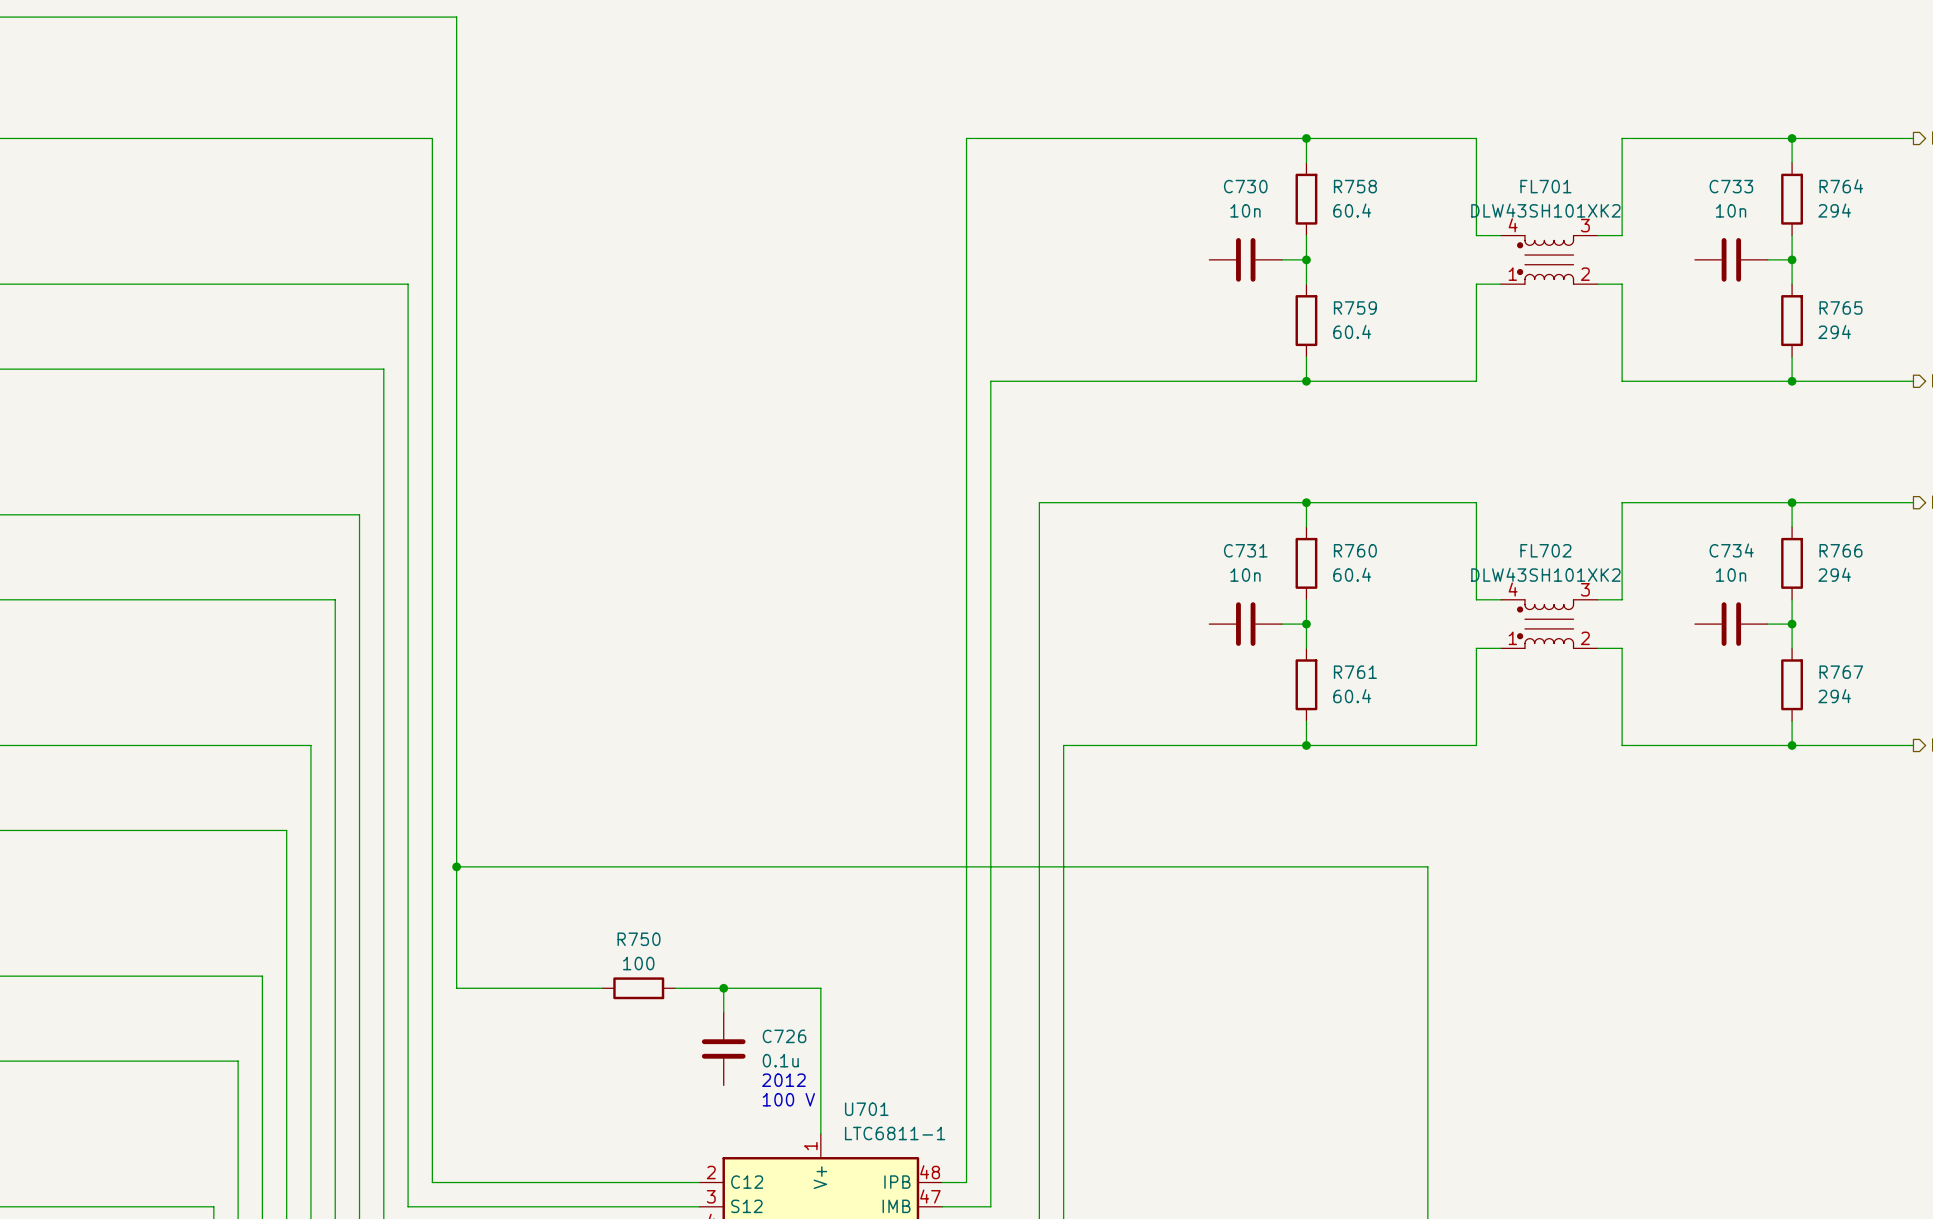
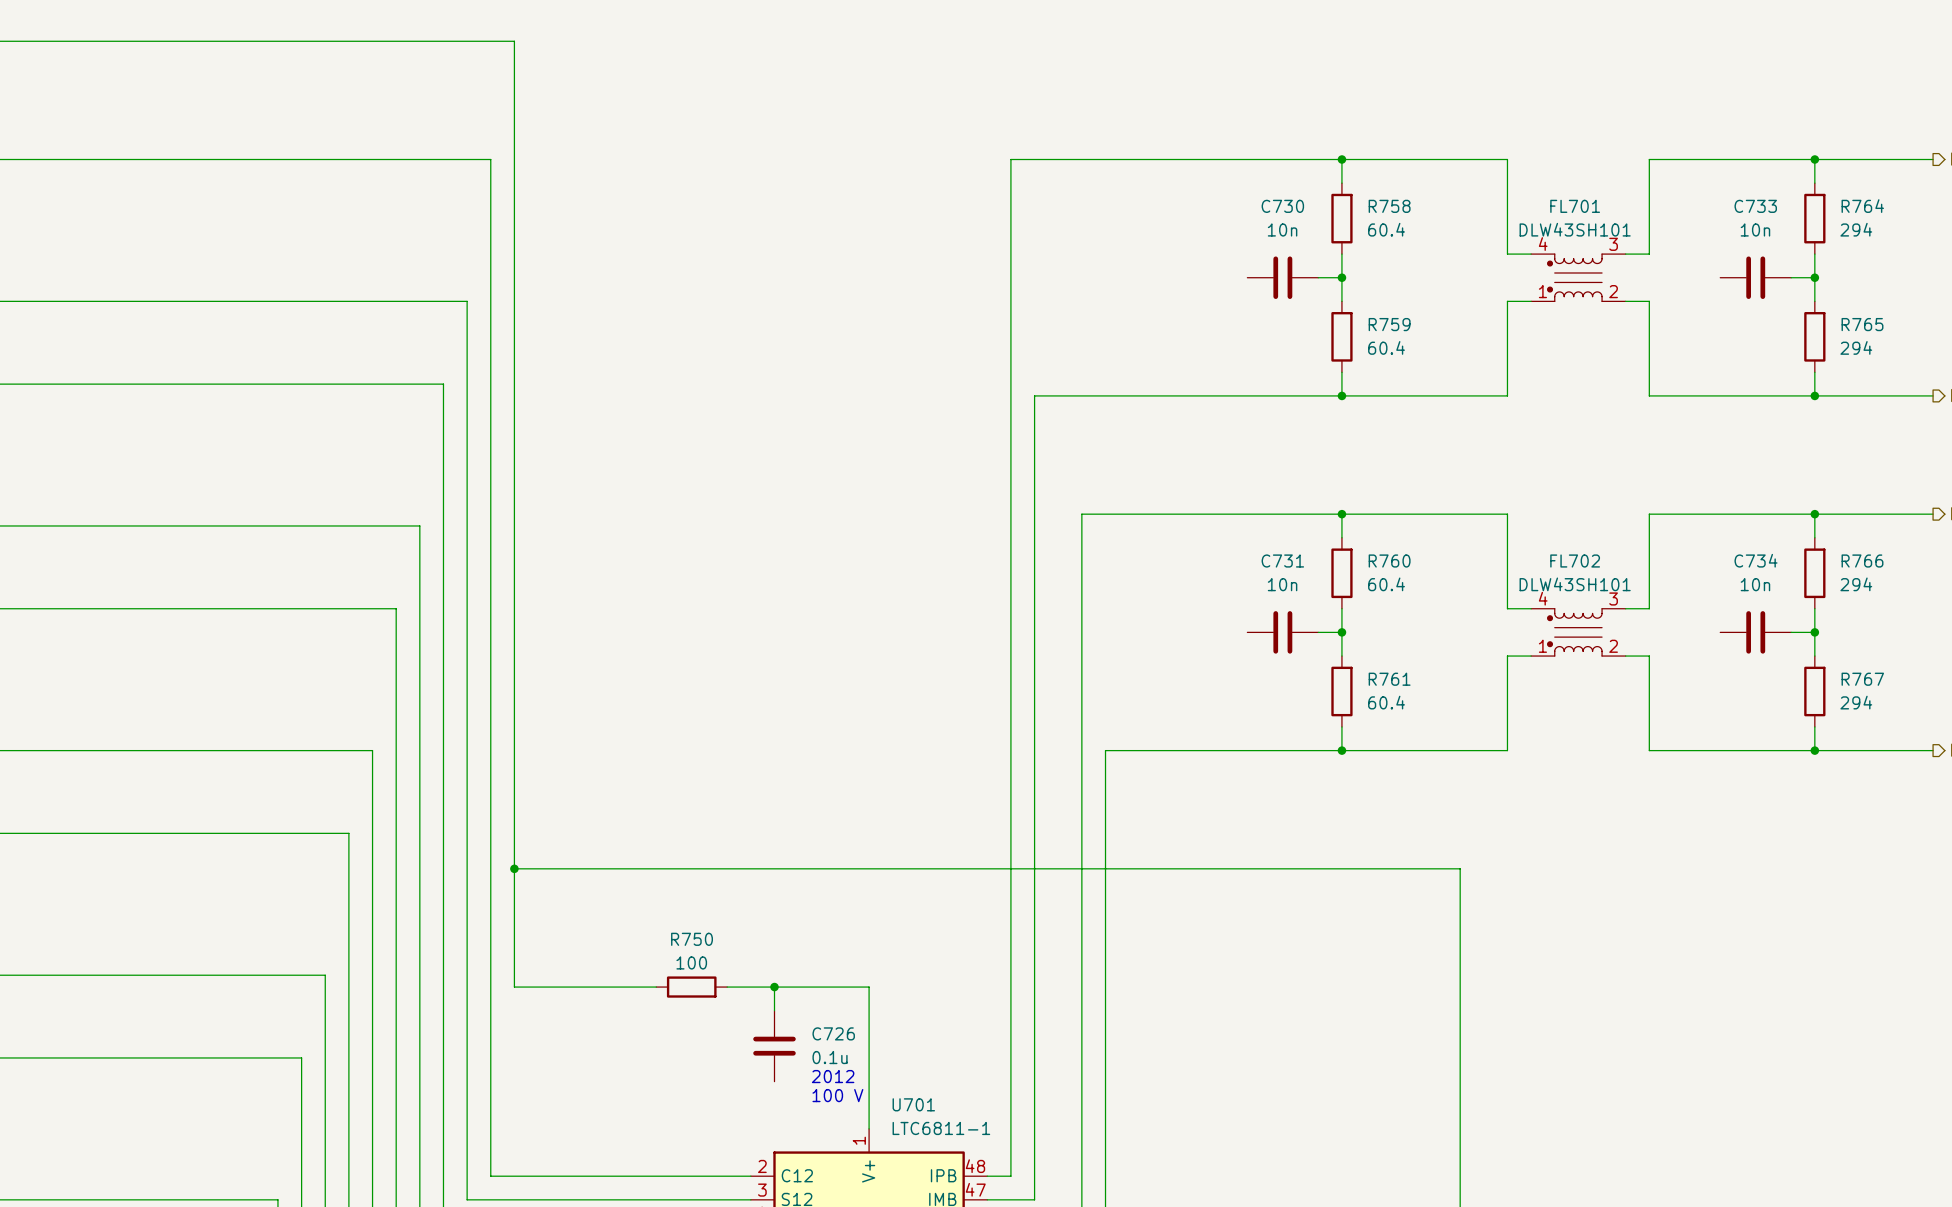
FL701 value: DLW43SH101XK2 (1545, 210) -> DLW43SH101 (1575, 229)
FL702 value: DLW43SH101XK2 (1545, 574) -> DLW43SH101 (1575, 584)

